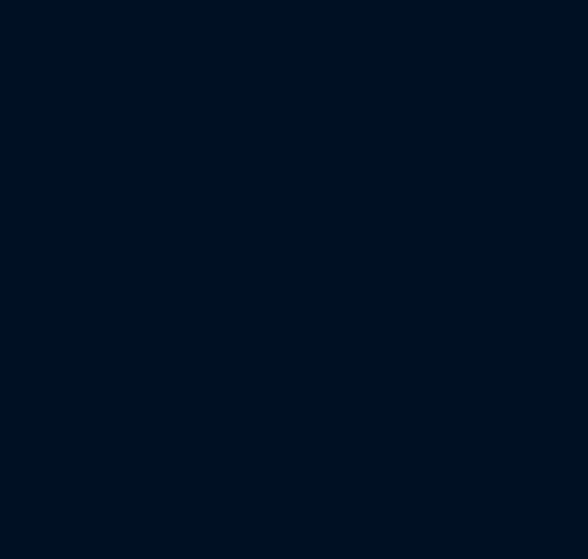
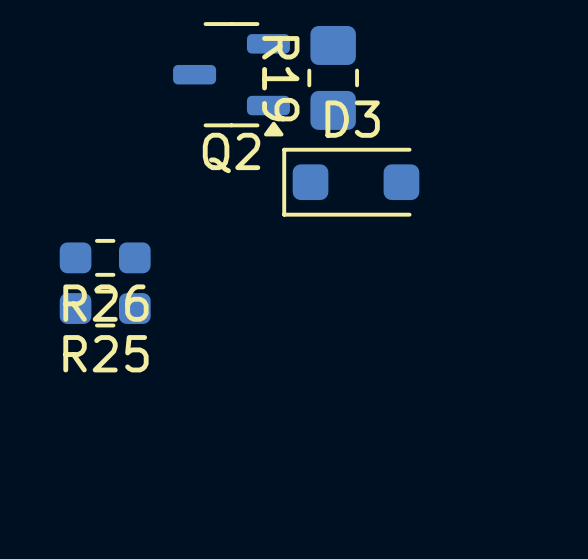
R19: none -> (333, 77)
Q2: none -> (231, 79)
D3: none -> (350, 182)
R26: none -> (105, 257)
R25: none -> (105, 308)

